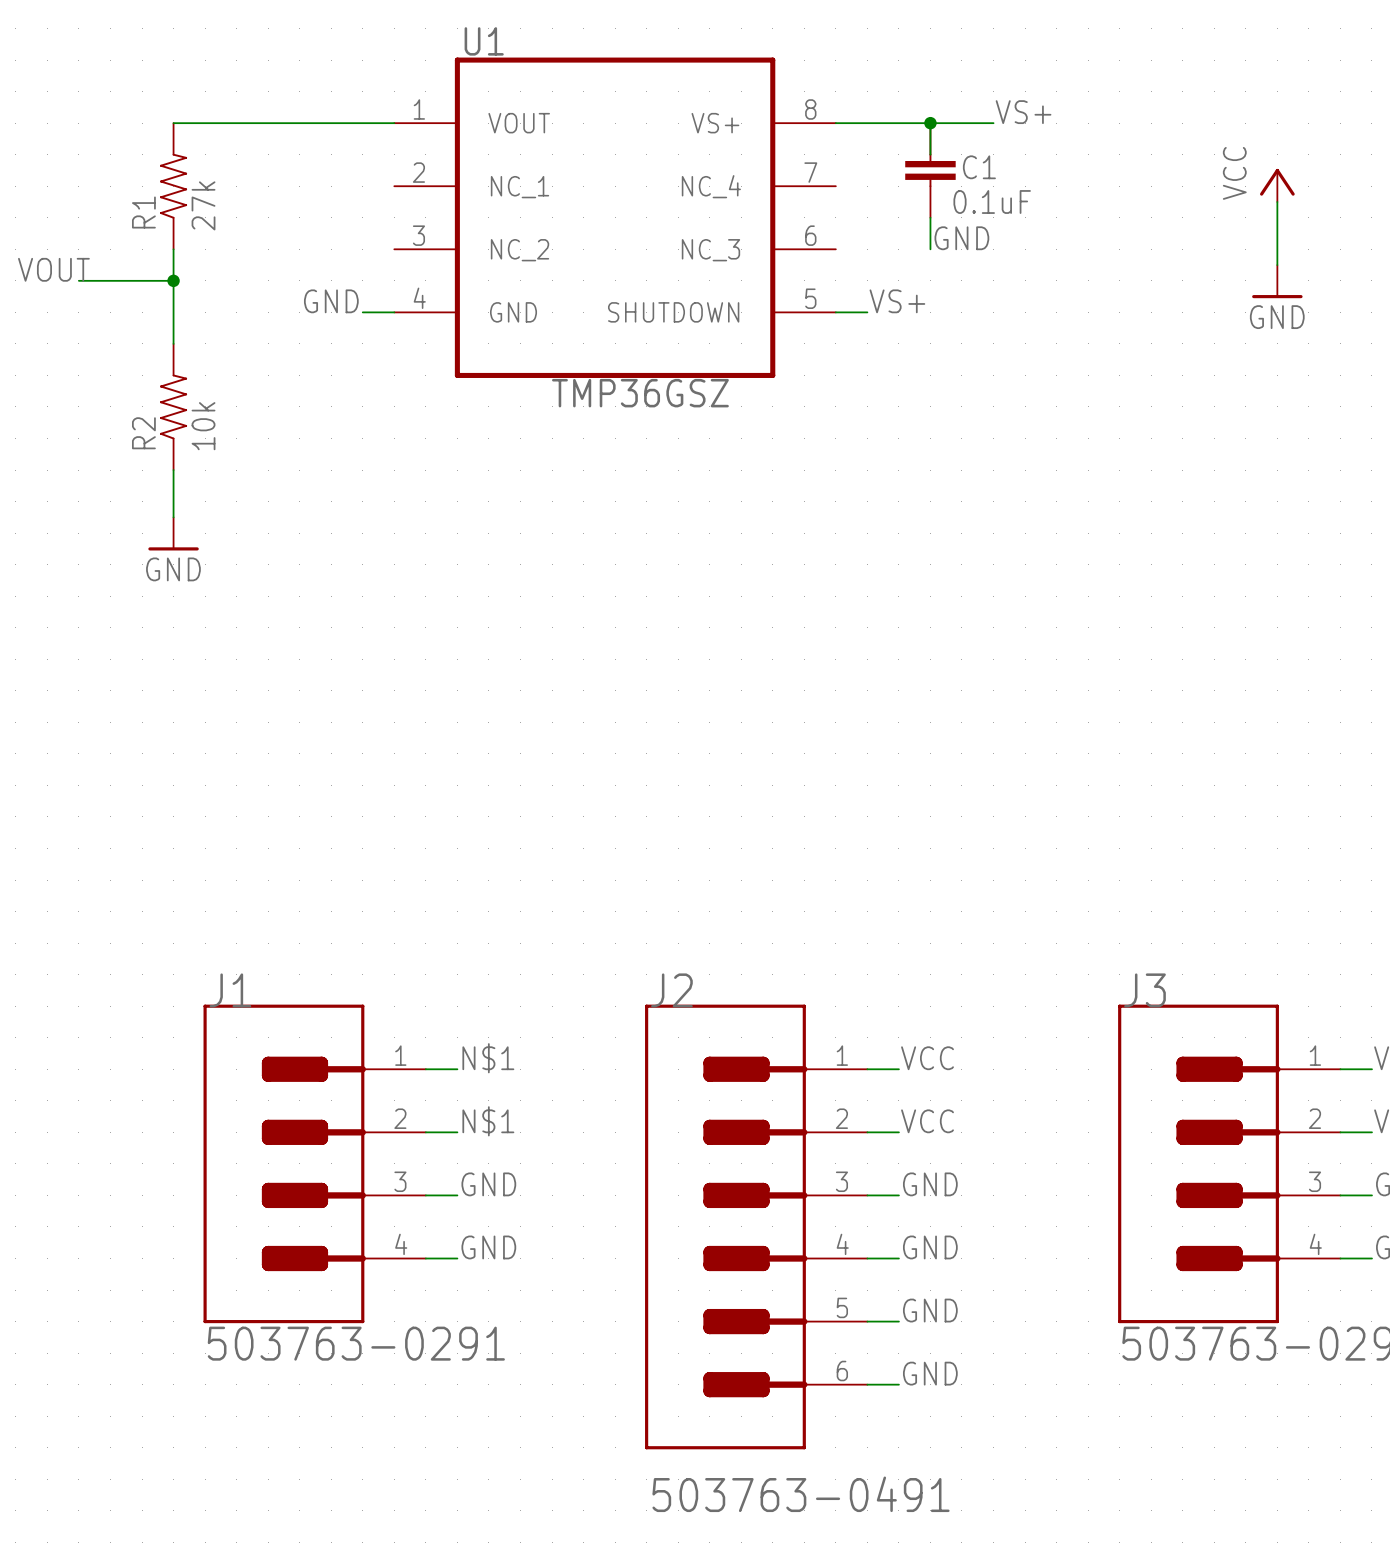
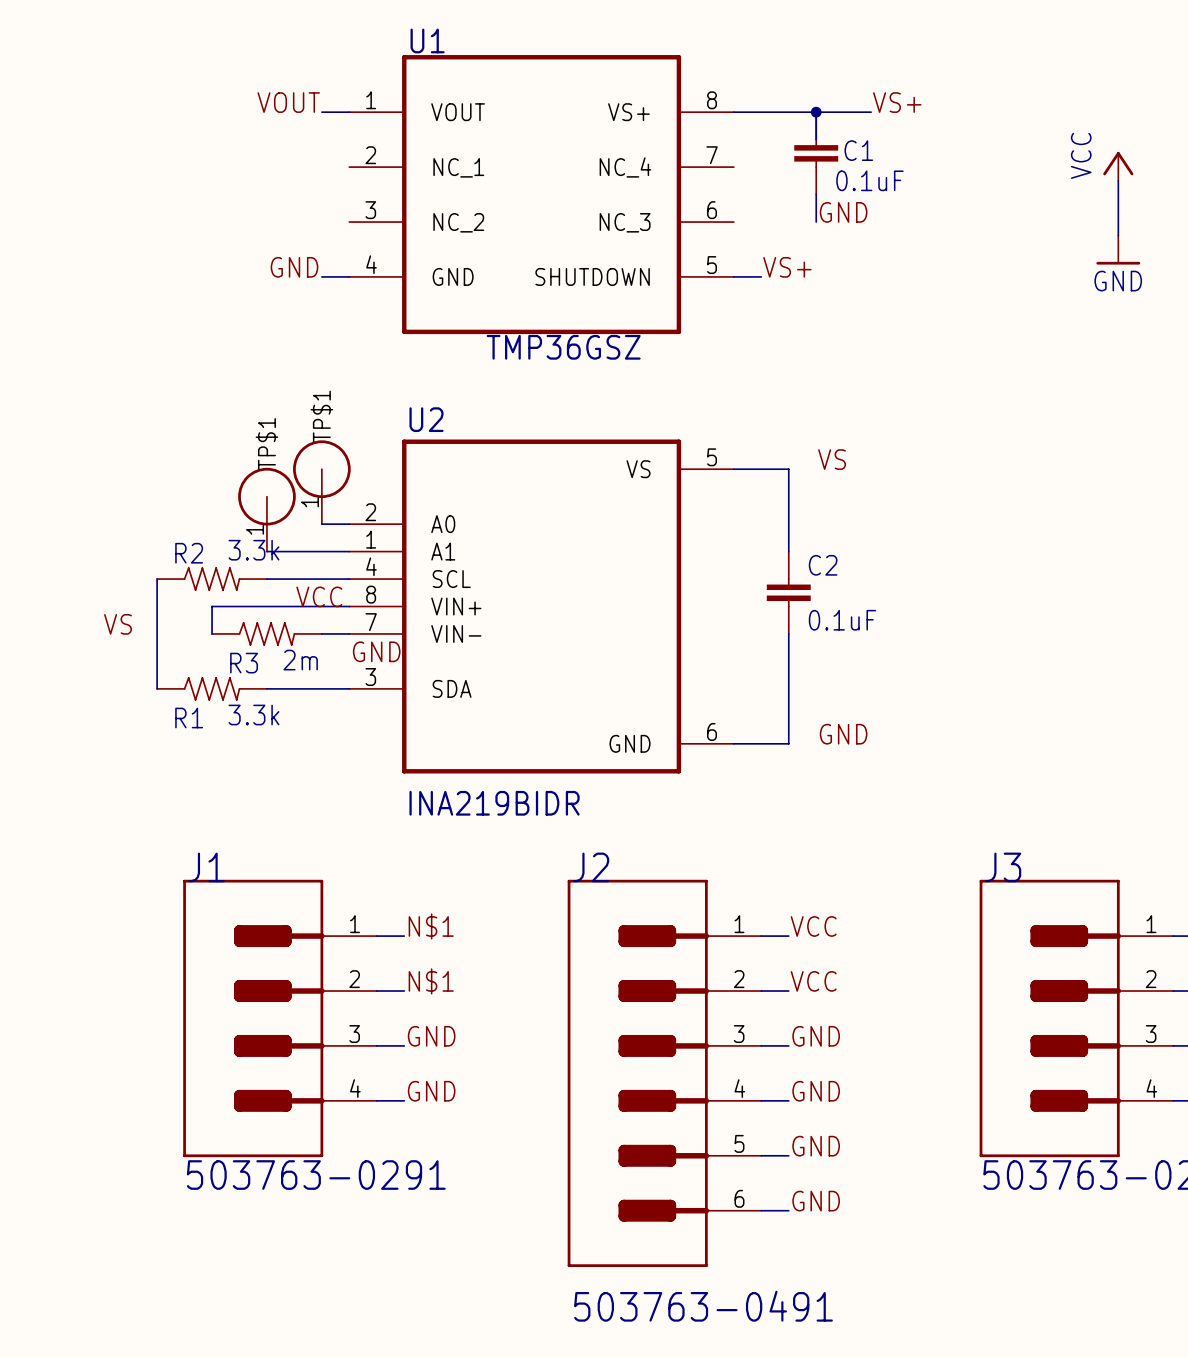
label: none -> VOUT (288, 102)
wire: (173, 123) (362, 123) -> none
R1 rotation: 0° (173, 186) -> 90° clockwise (212, 688)
R1 position: (173, 186) -> (212, 688)
R1 value: 27k (203, 205) -> 3.3k (253, 714)
wire: (173, 249) (173, 343) -> none
label: VOUT (53, 269) -> none
wire: (78, 280) (173, 280) -> none
junction: (173, 280) -> none
R2 rotation: 0° (173, 406) -> 90° clockwise (212, 579)
R2 position: (173, 406) -> (212, 579)
R2 value: 10k (203, 426) -> 3.3k (253, 550)
wire: (173, 470) (173, 517) -> none
label: none -> VS (832, 459)
power symbol: GND (173, 533) -> none
wire: none -> (733, 469) (788, 469) (788, 551)
part: none -> (321, 482)
part: none -> (266, 509)
wire: none -> (321, 524) (349, 524)
wire: none -> (266, 551) (349, 551)
wire: none -> (157, 579) (157, 688)
wire: none -> (266, 579) (349, 579)
C2: none -> 0.1uF (788, 592)
label: none -> VCC (319, 596)
wire: none -> (349, 606) (212, 606) (212, 633)
U2: none -> INA219BIDR (541, 606)
label: none -> VS (118, 624)
R3: none -> 2m (266, 633)
wire: none -> (321, 633) (349, 633)
wire: none -> (788, 633) (788, 743) (733, 743)
label: none -> GND (376, 651)
wire: none -> (266, 688) (349, 688)
label: none -> GND (843, 734)

